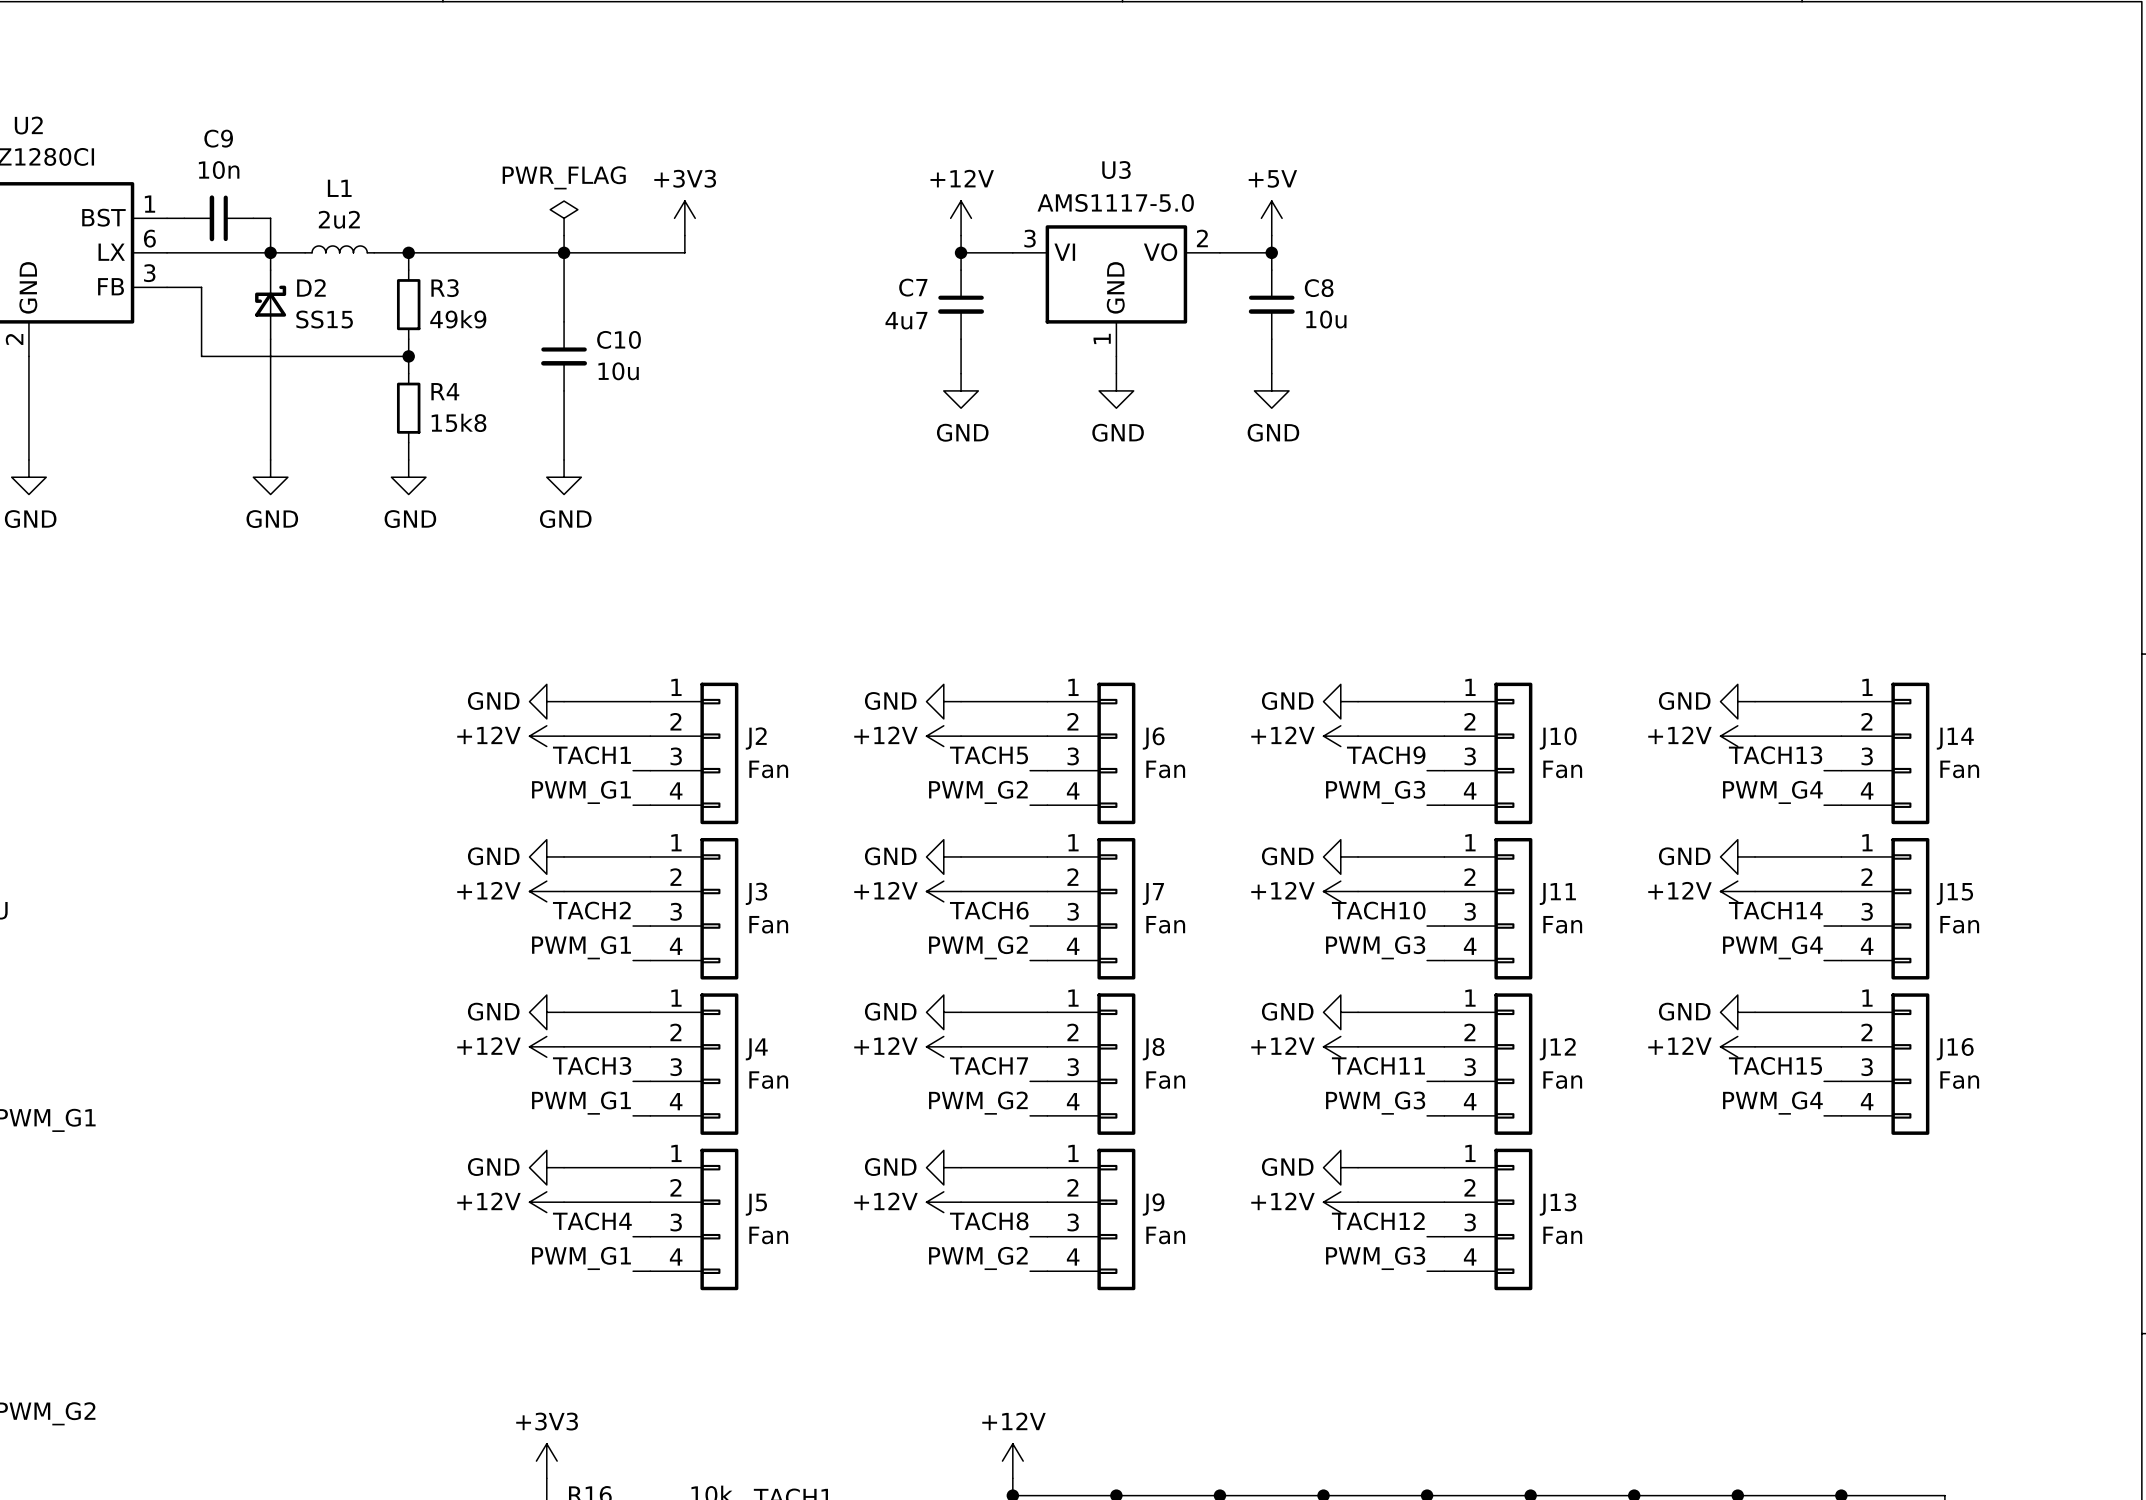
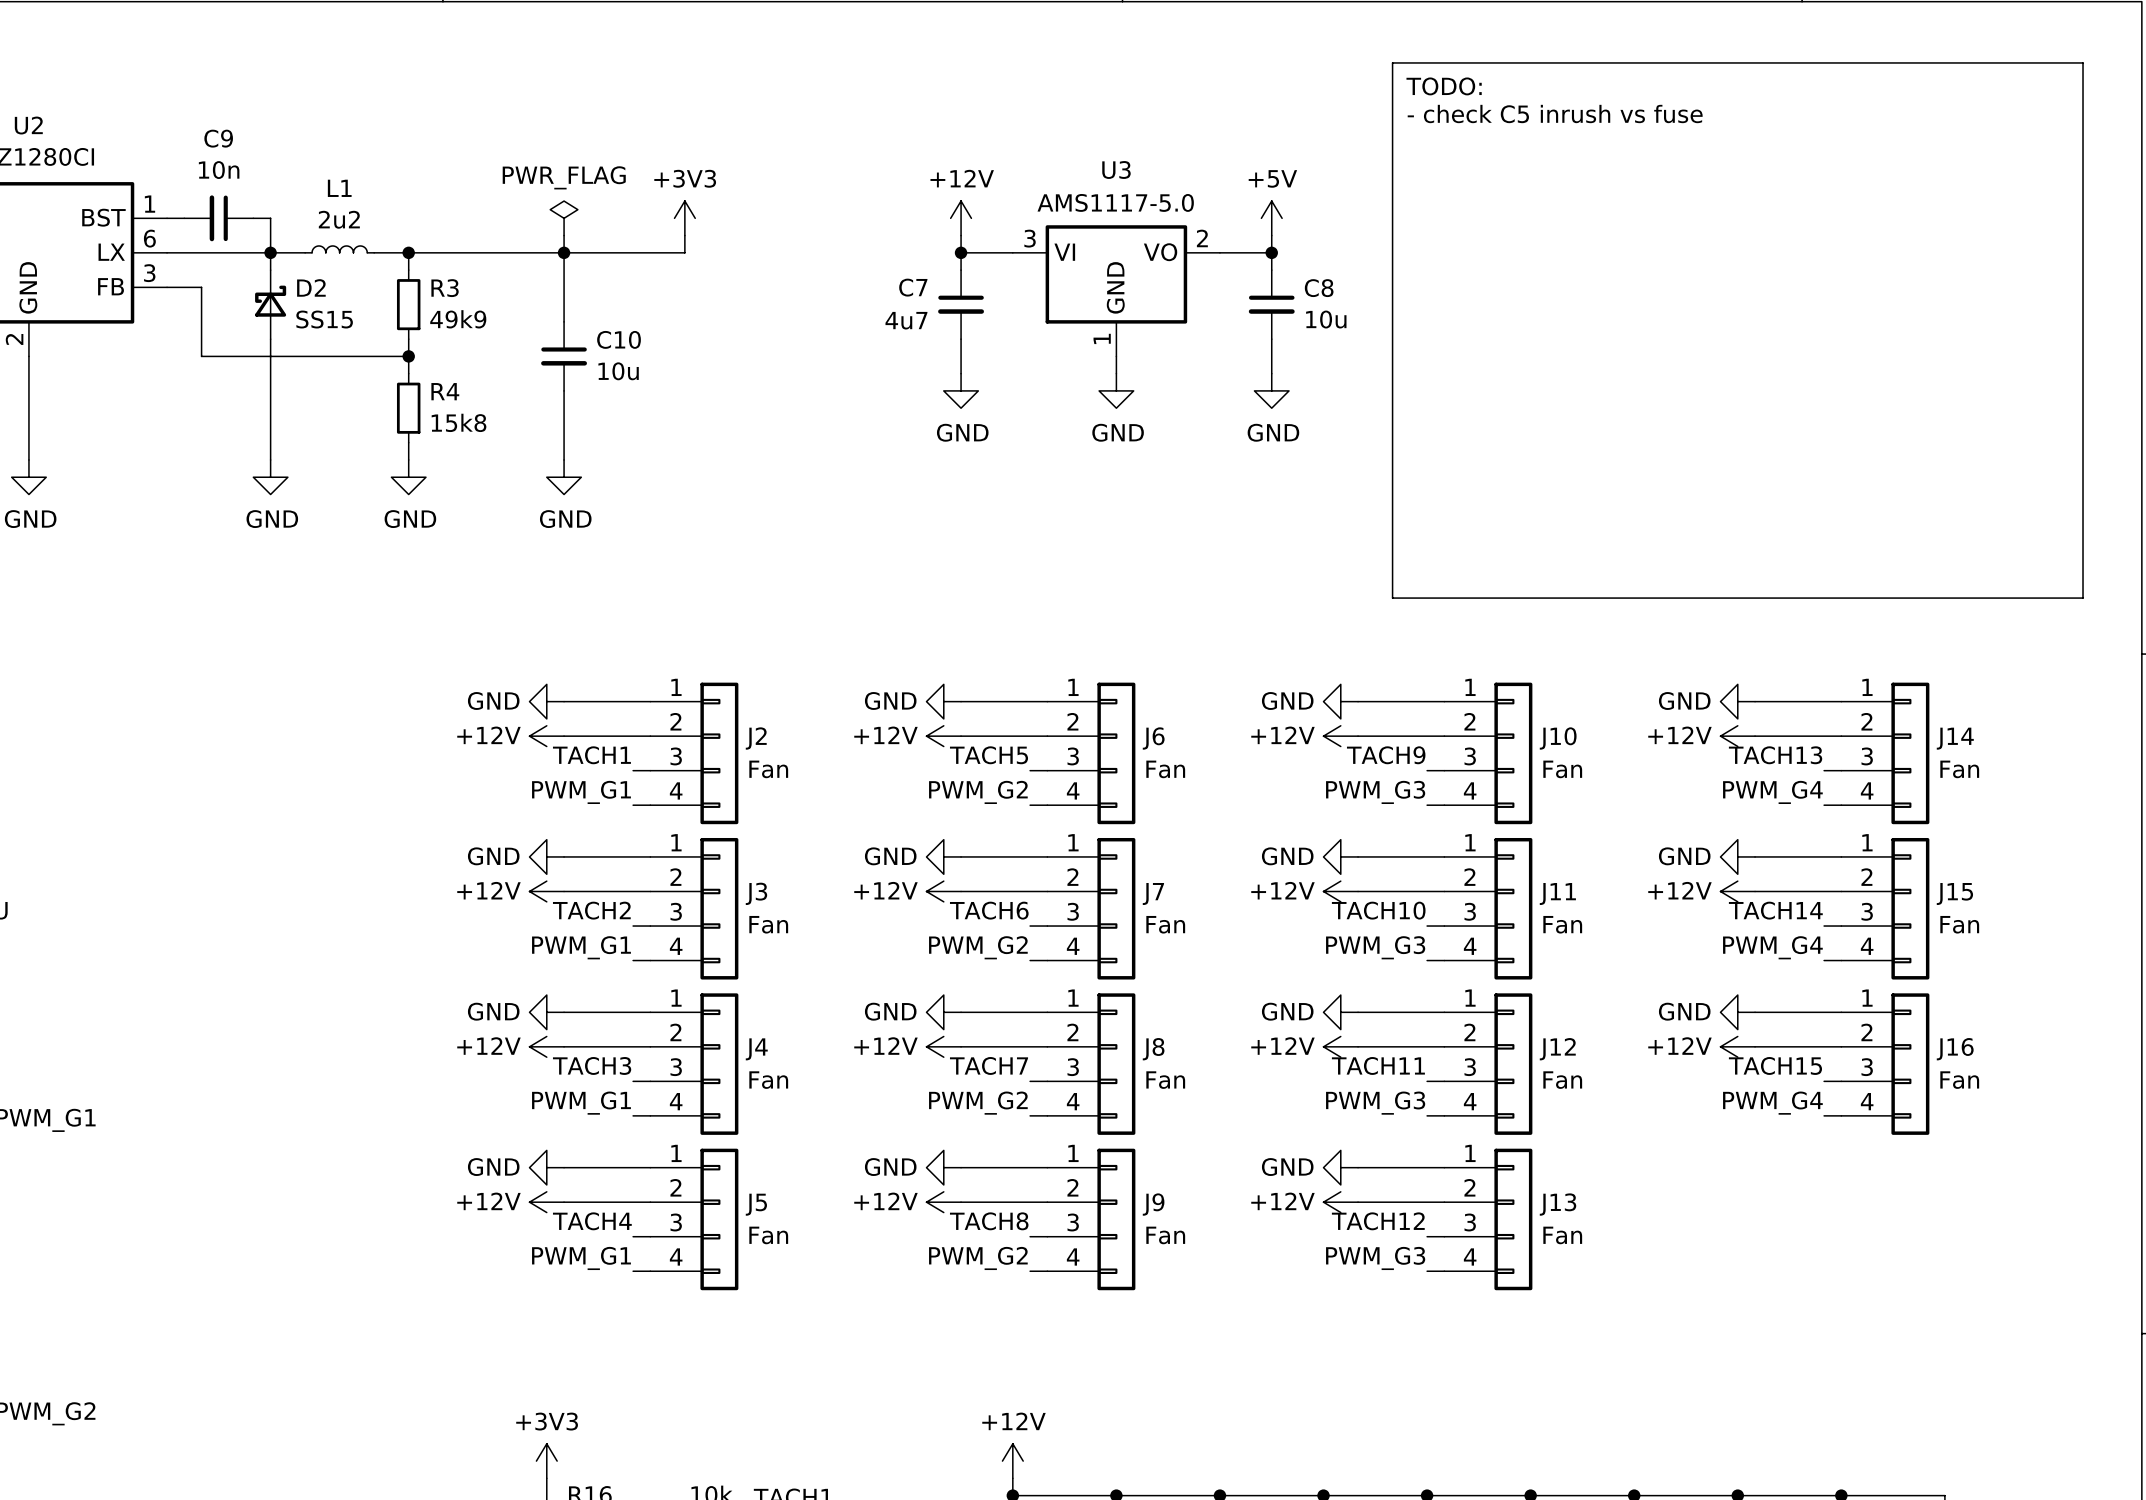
line: none -> (1392, 62) (2083, 62) (2083, 598) (1392, 598) (1392, 62)
text: none -> TODO: (1444, 86)
text: none -> - check C5 inrush vs fuse (1555, 114)

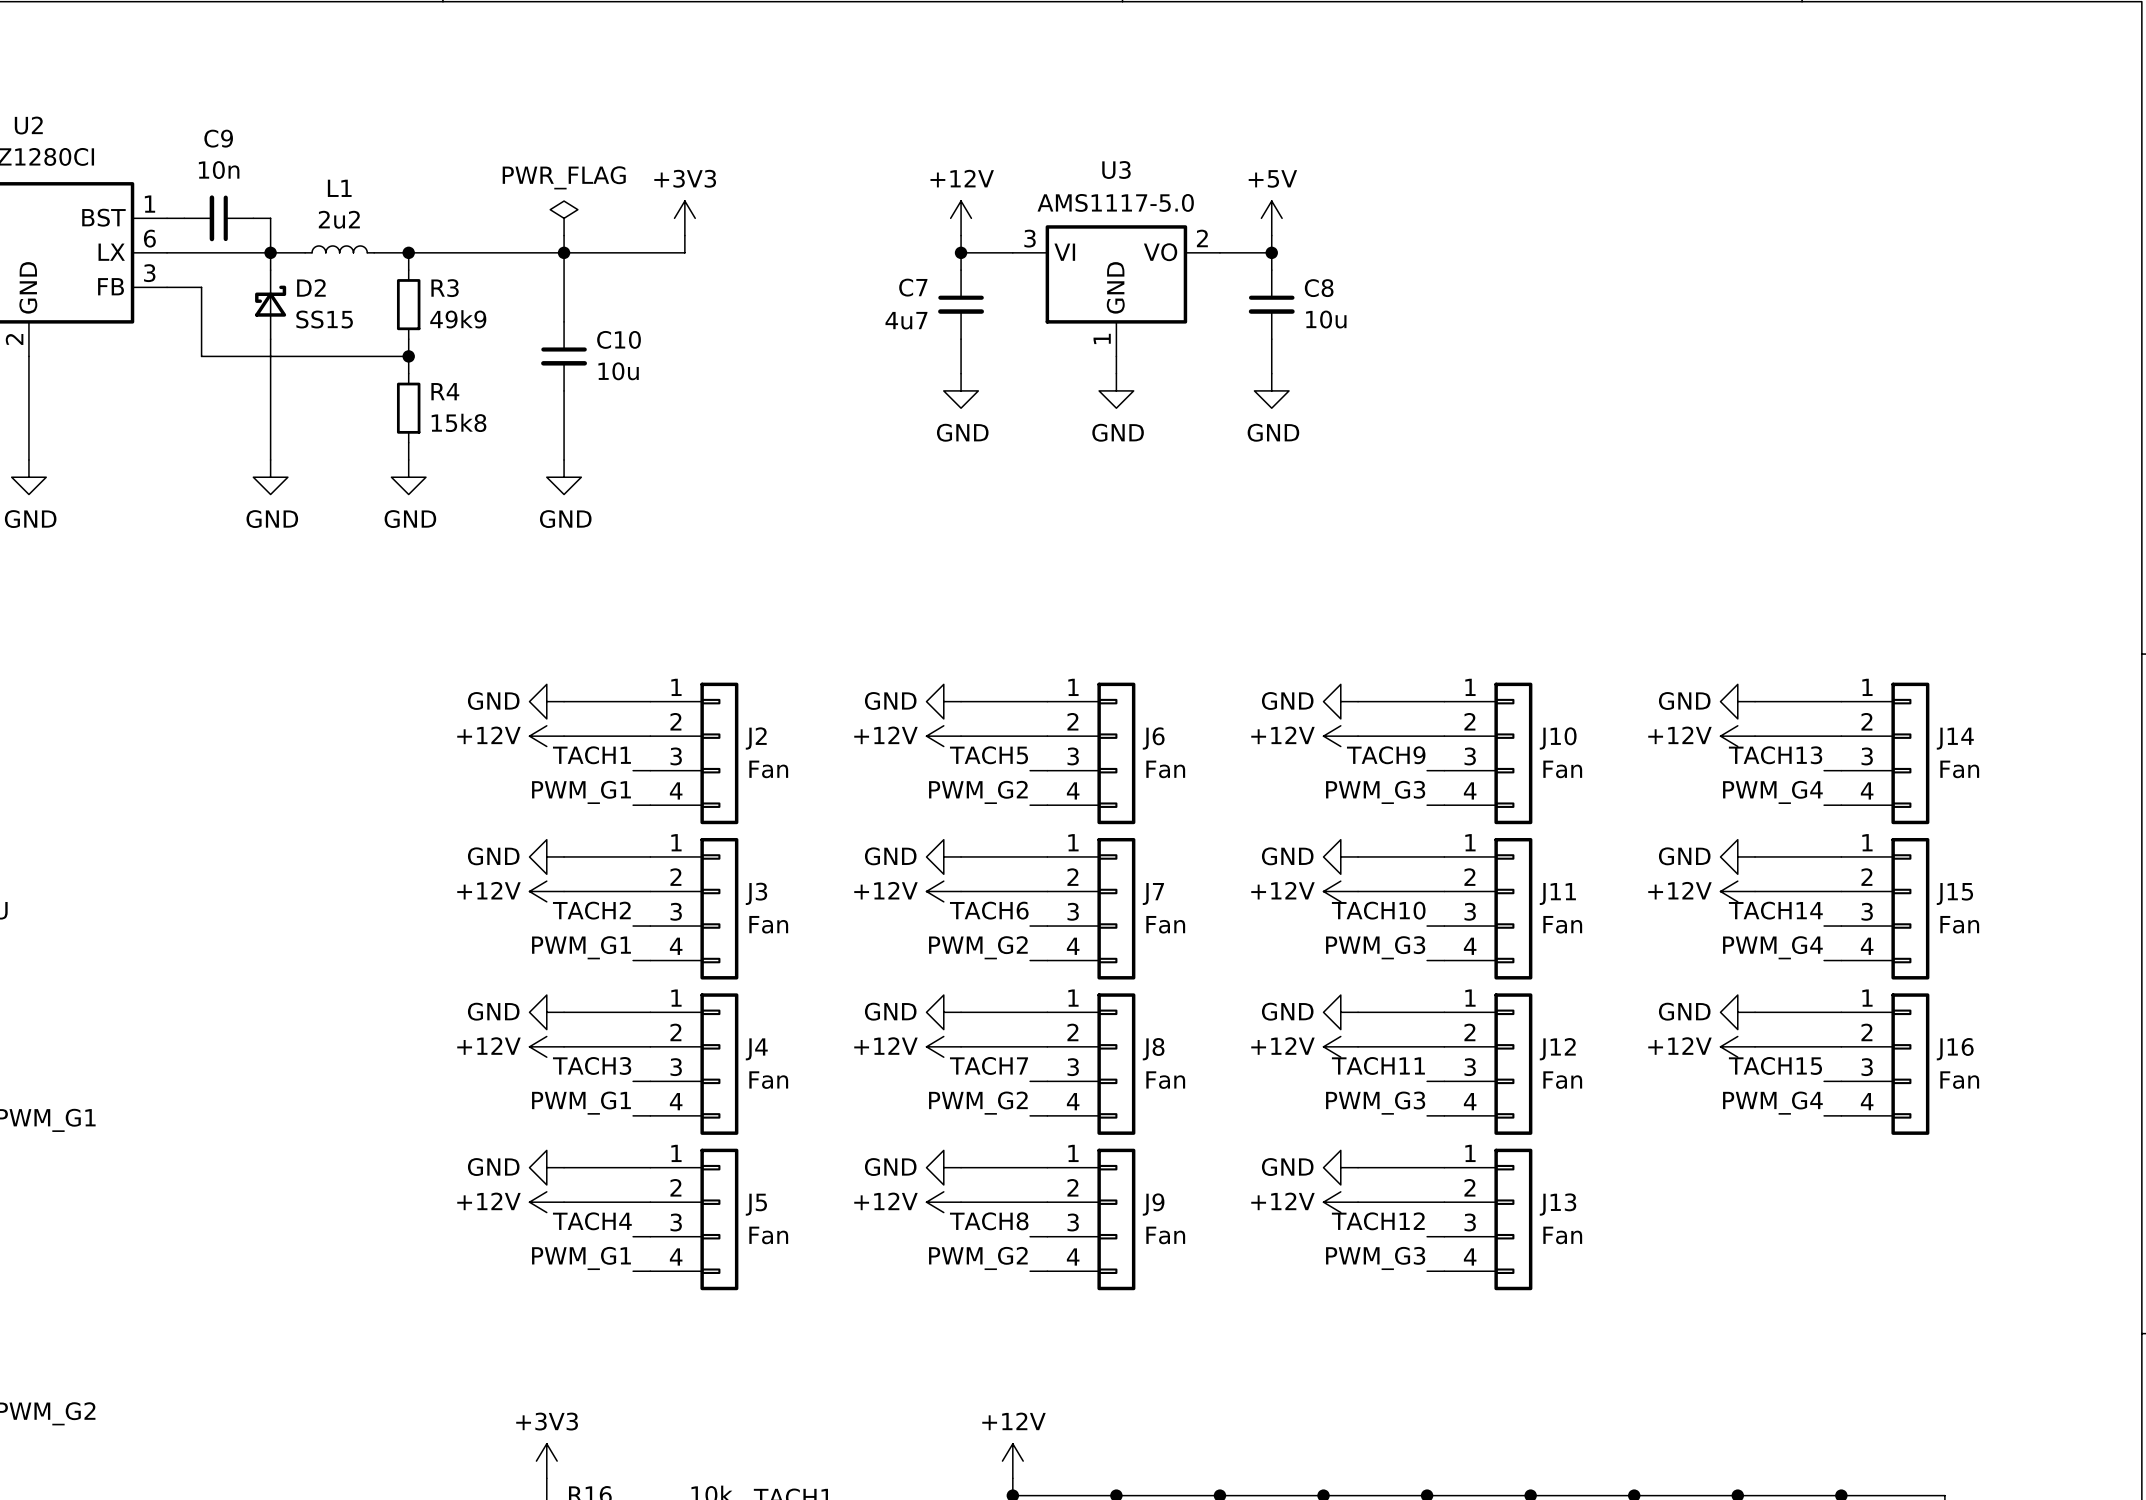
line: (1392, 62) (2083, 62) (2083, 598) (1392, 598) (1392, 62) -> none
text: TODO: (1444, 86) -> none
text: - check C5 inrush vs fuse (1555, 114) -> none

